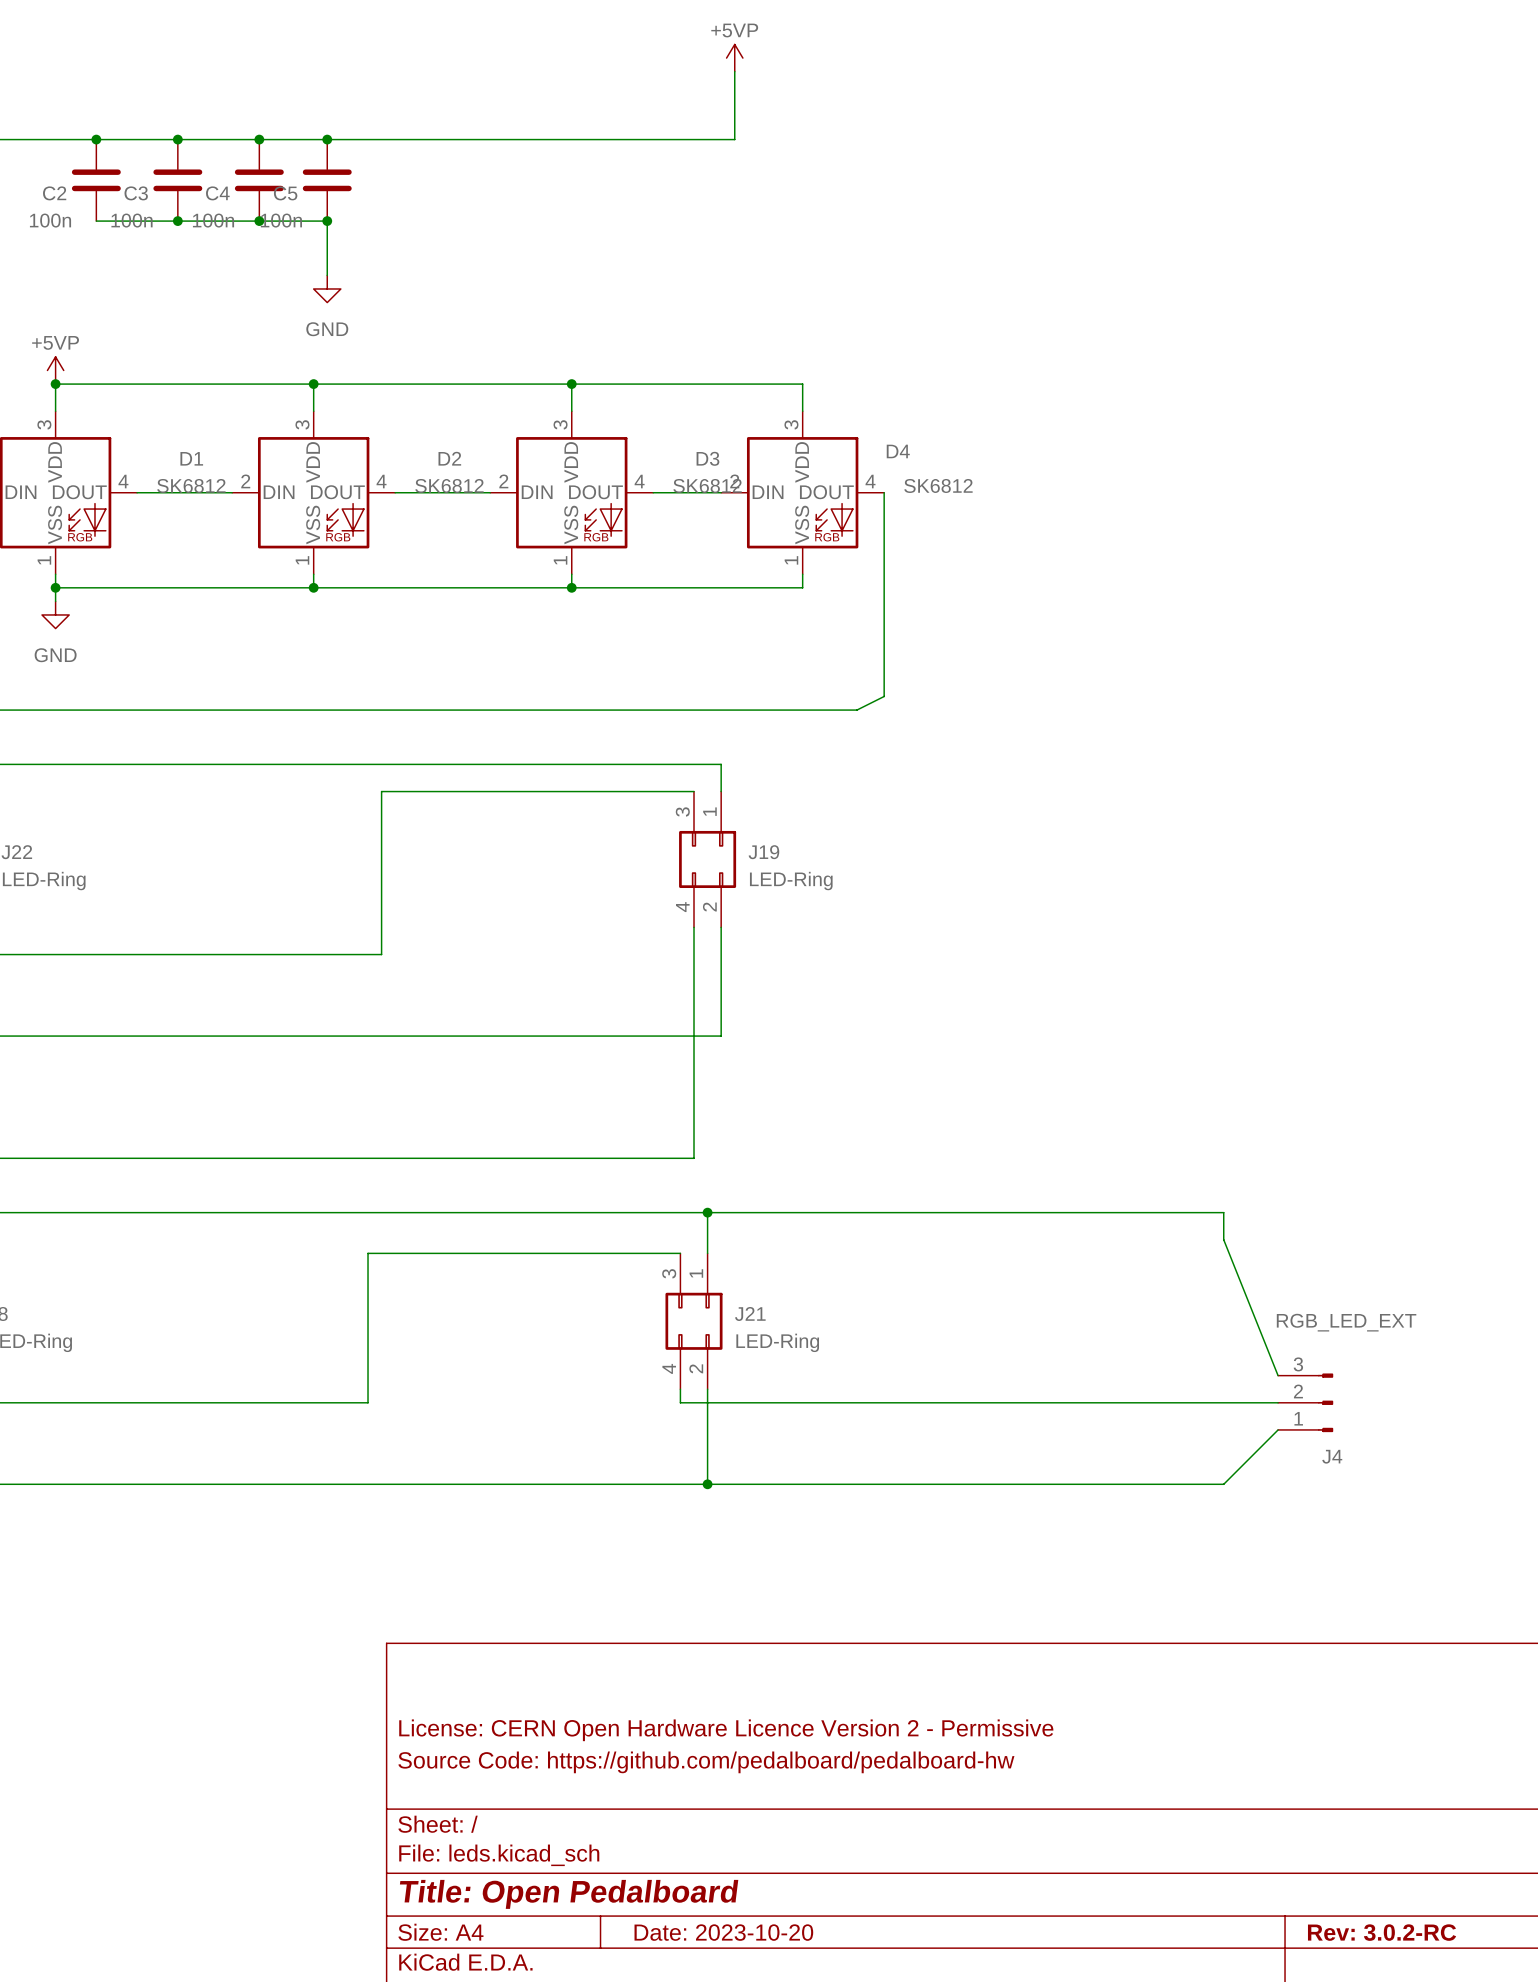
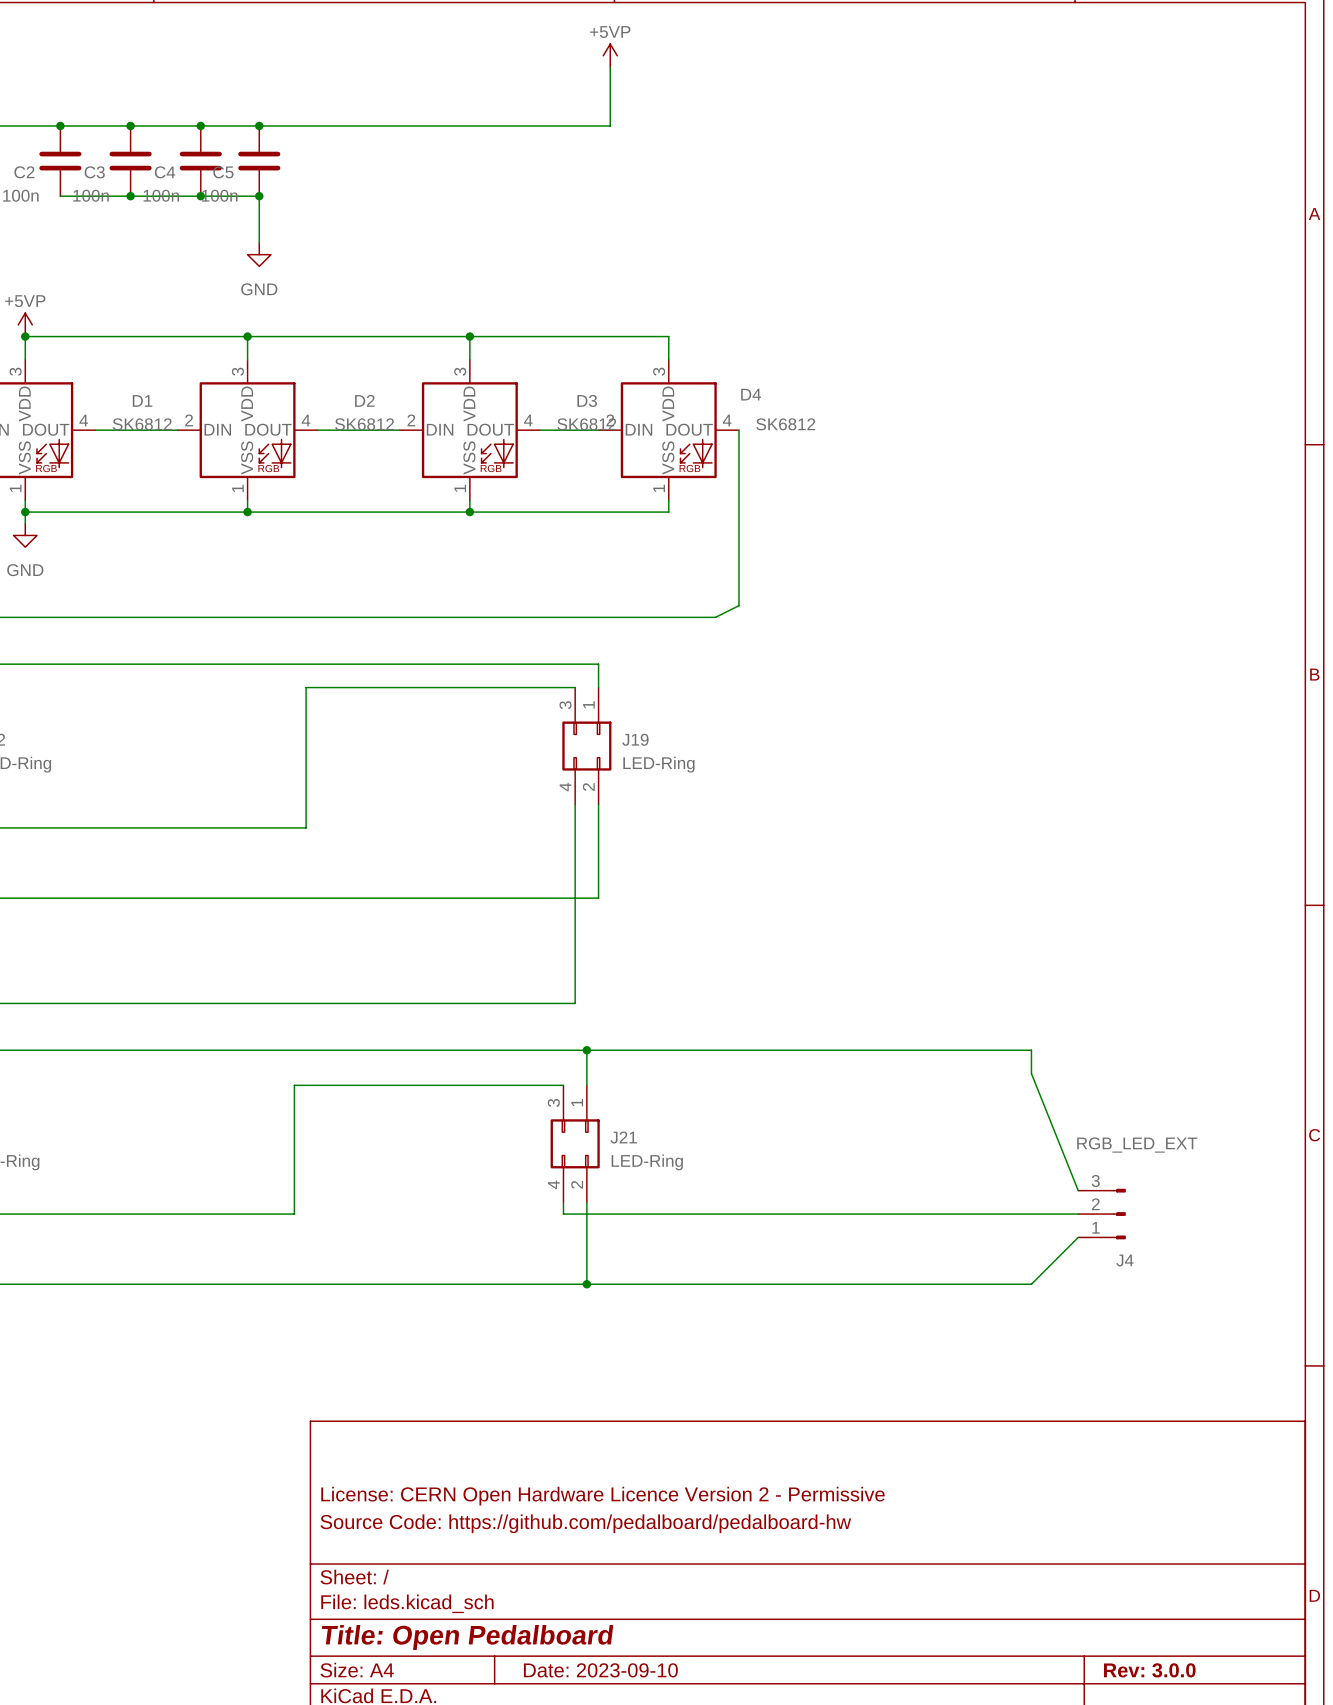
title block: Date: 2023-10-20 (723, 1932) -> Date: 2023-09-10 (600, 1670)
title block: Rev: 3.0.2-RC (1382, 1932) -> Rev: 3.0.0 (1149, 1670)

